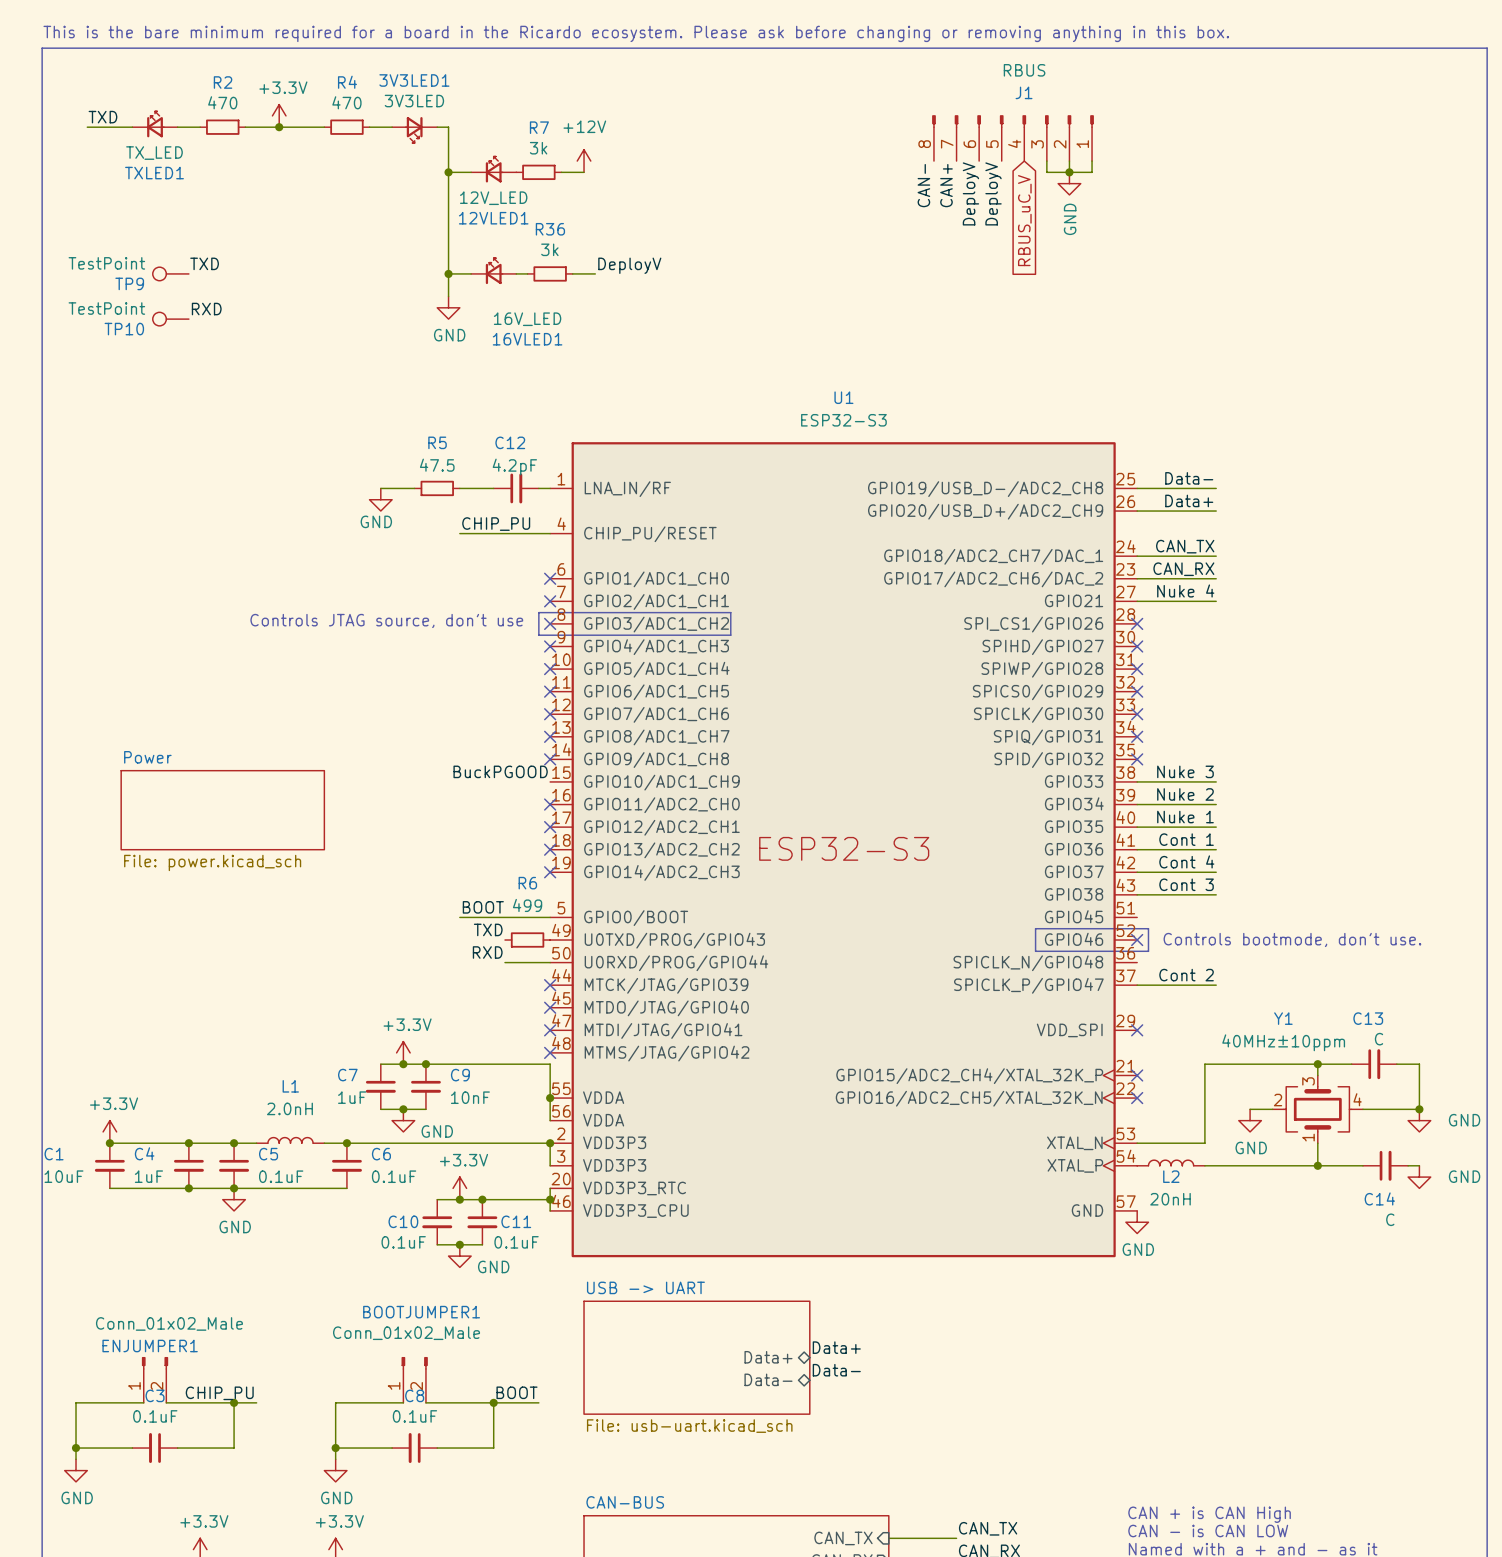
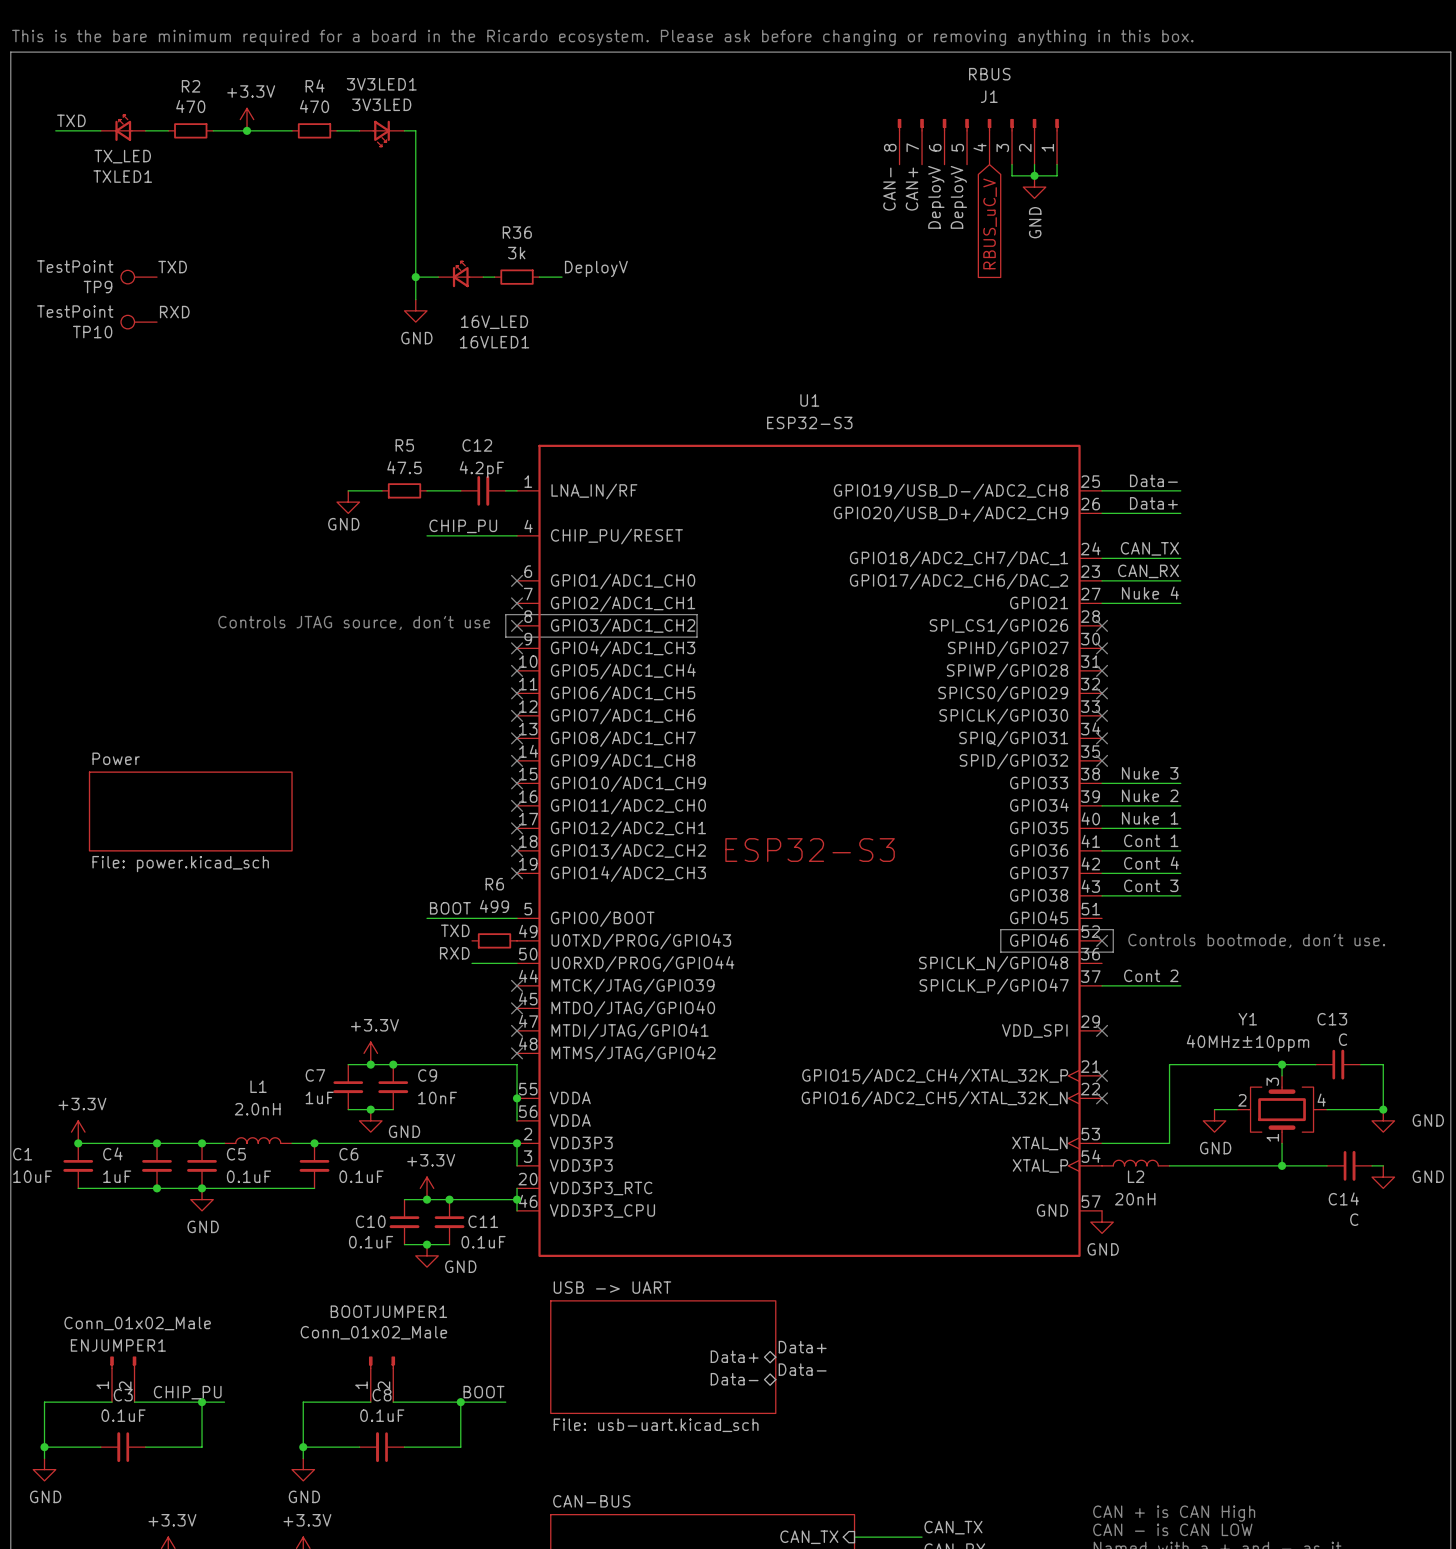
power symbol: +12V (584, 161) -> none
12VLED1: 12V_LED (493, 169) -> none
wire: (448, 172) (471, 172) -> none
junction: (448, 172) -> none
R7: 3k (538, 172) -> none
wire: (561, 172) (584, 172) -> none
label: BuckPGOOD (500, 771) -> none
no-connect mark: none -> (517, 783)

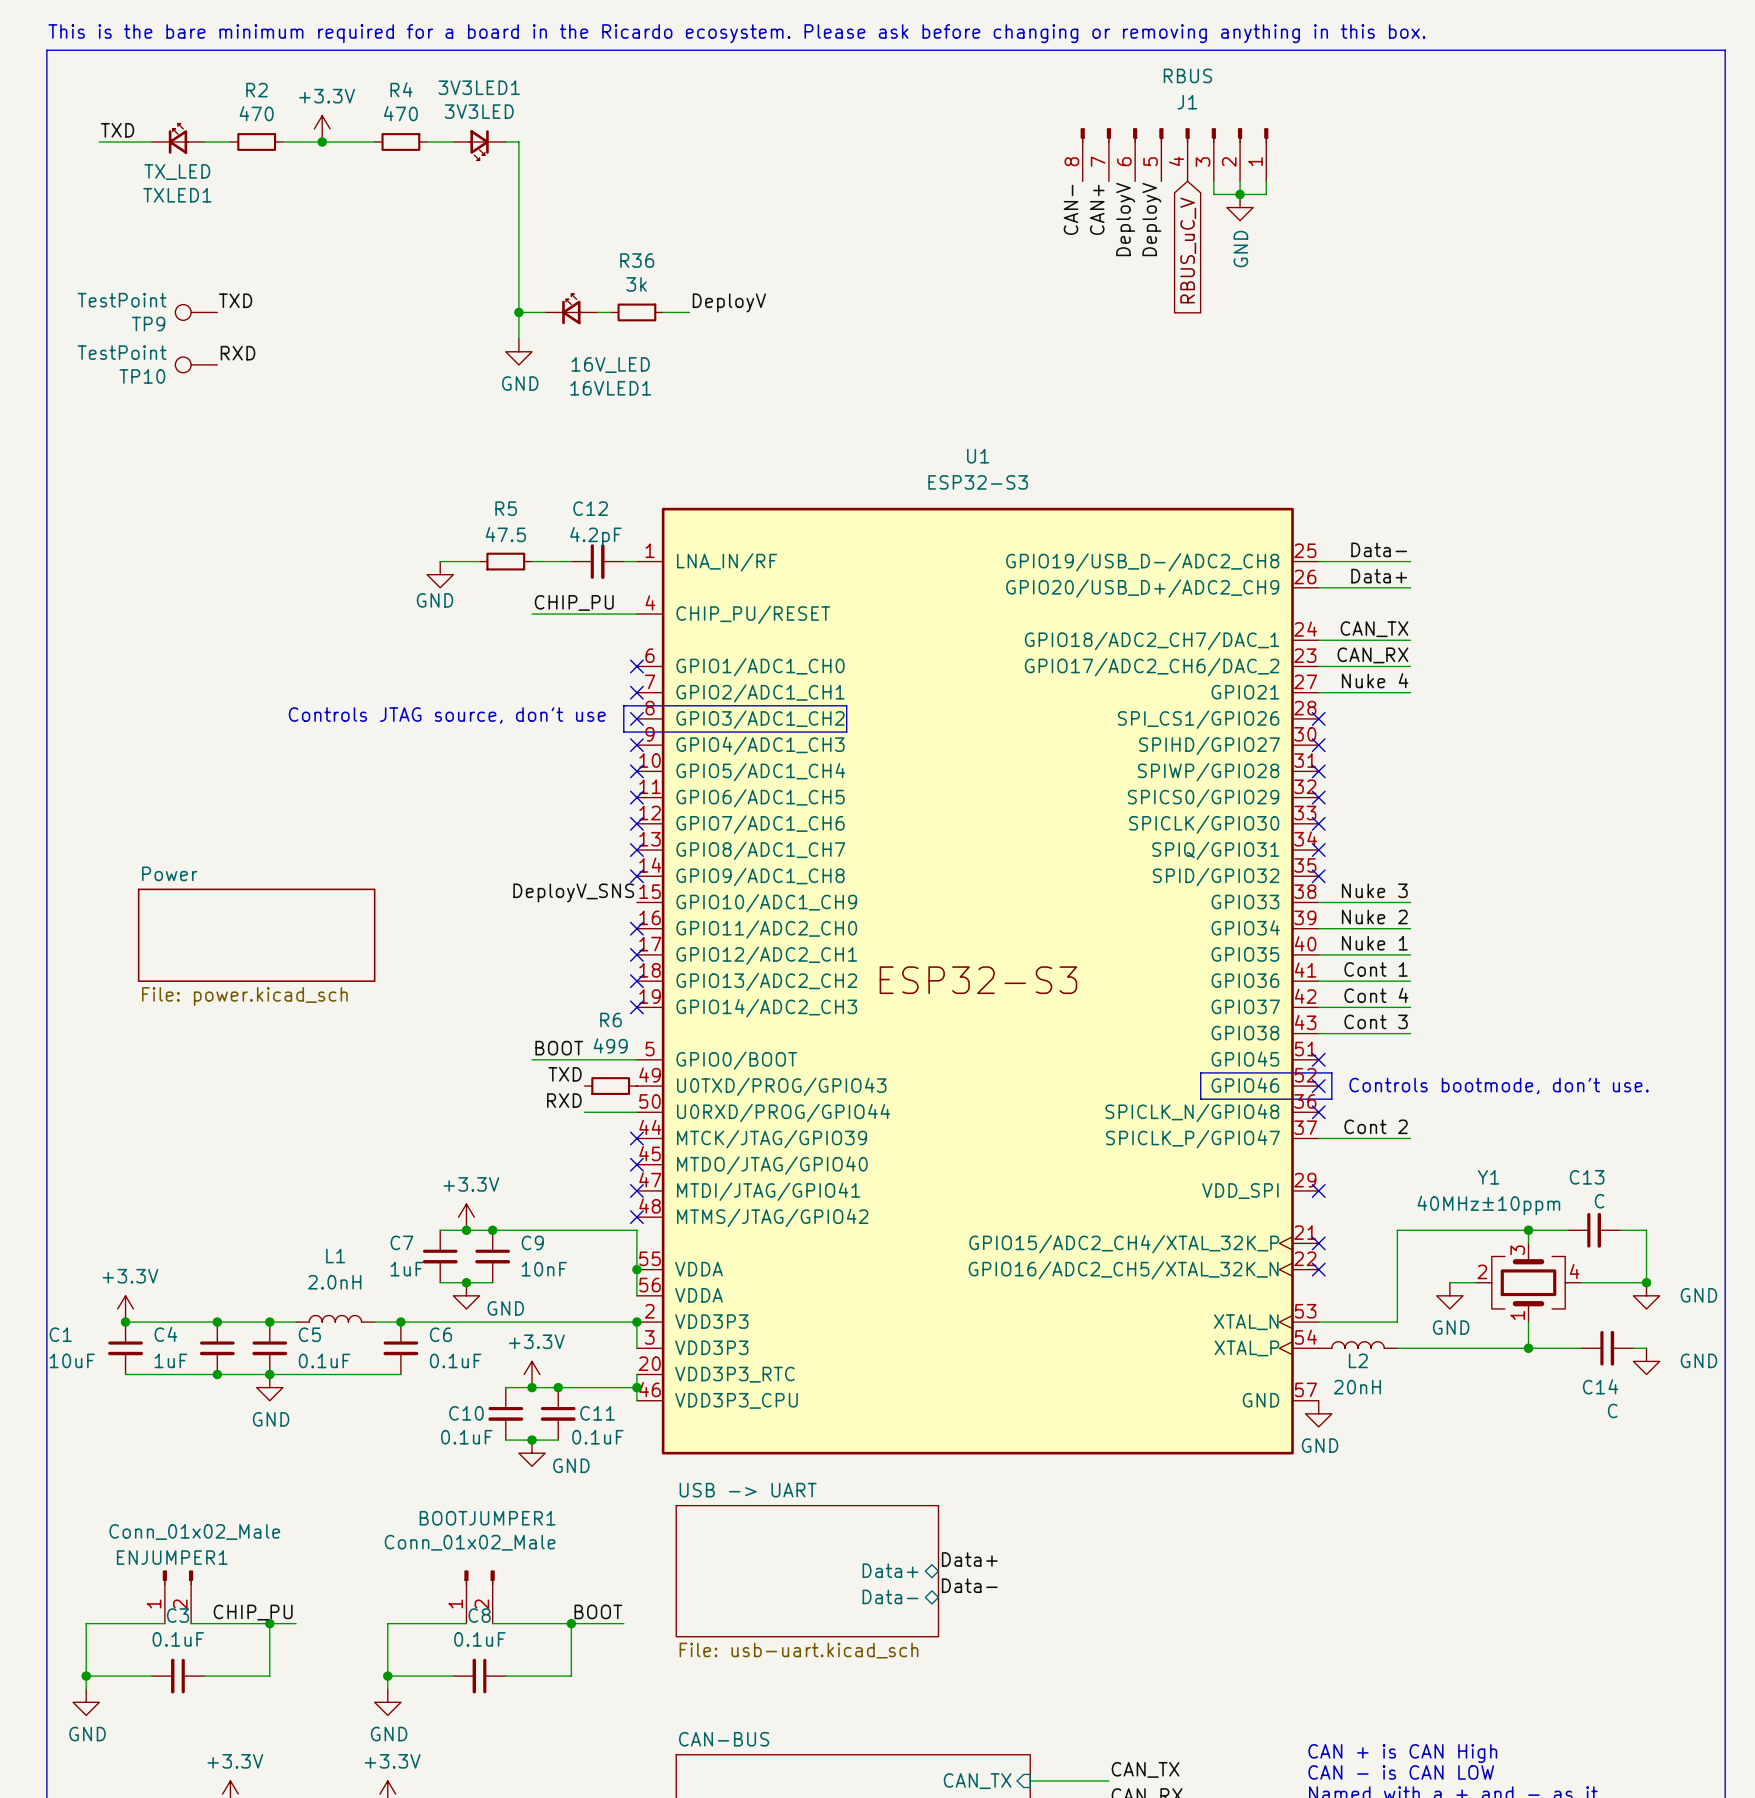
label: none -> DeployV_SNS (573, 892)
no-connect mark: (517, 783) -> none
no-connect mark: none -> (1318, 1059)
no-connect mark: none -> (1318, 1112)

